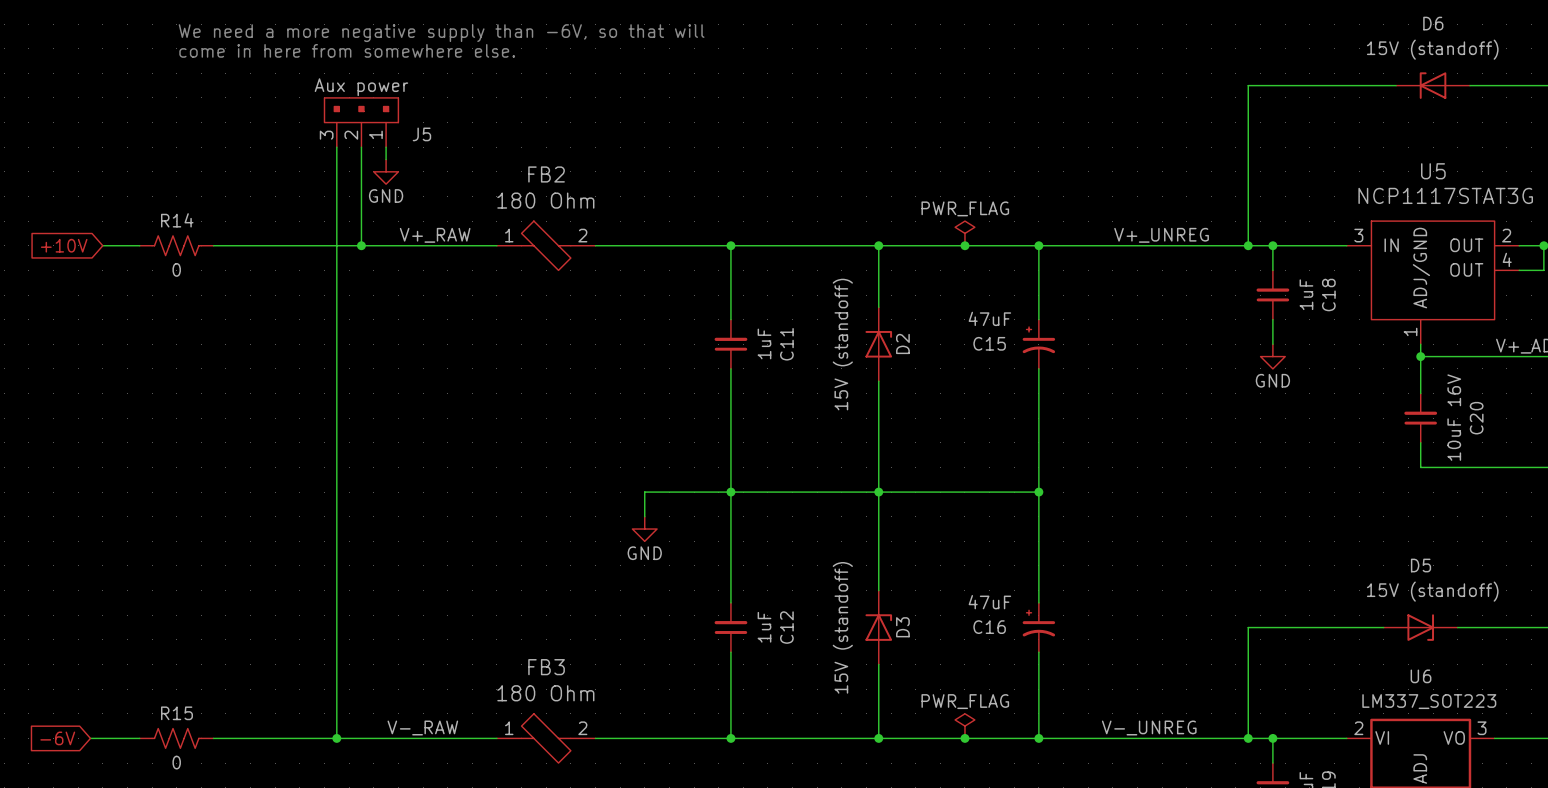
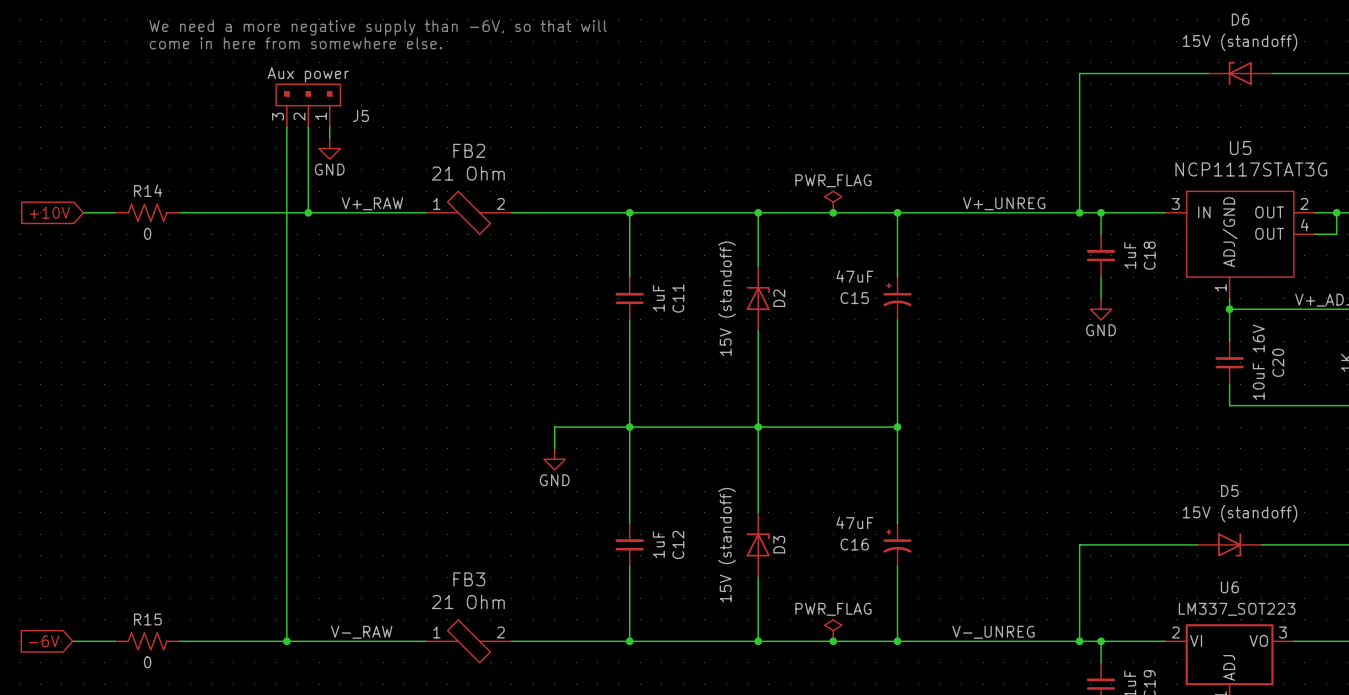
FB2 value: 180 Ohm (545, 200) -> 21 Ohm (468, 173)
FB3 value: 180 Ohm (545, 693) -> 21 Ohm (468, 602)

